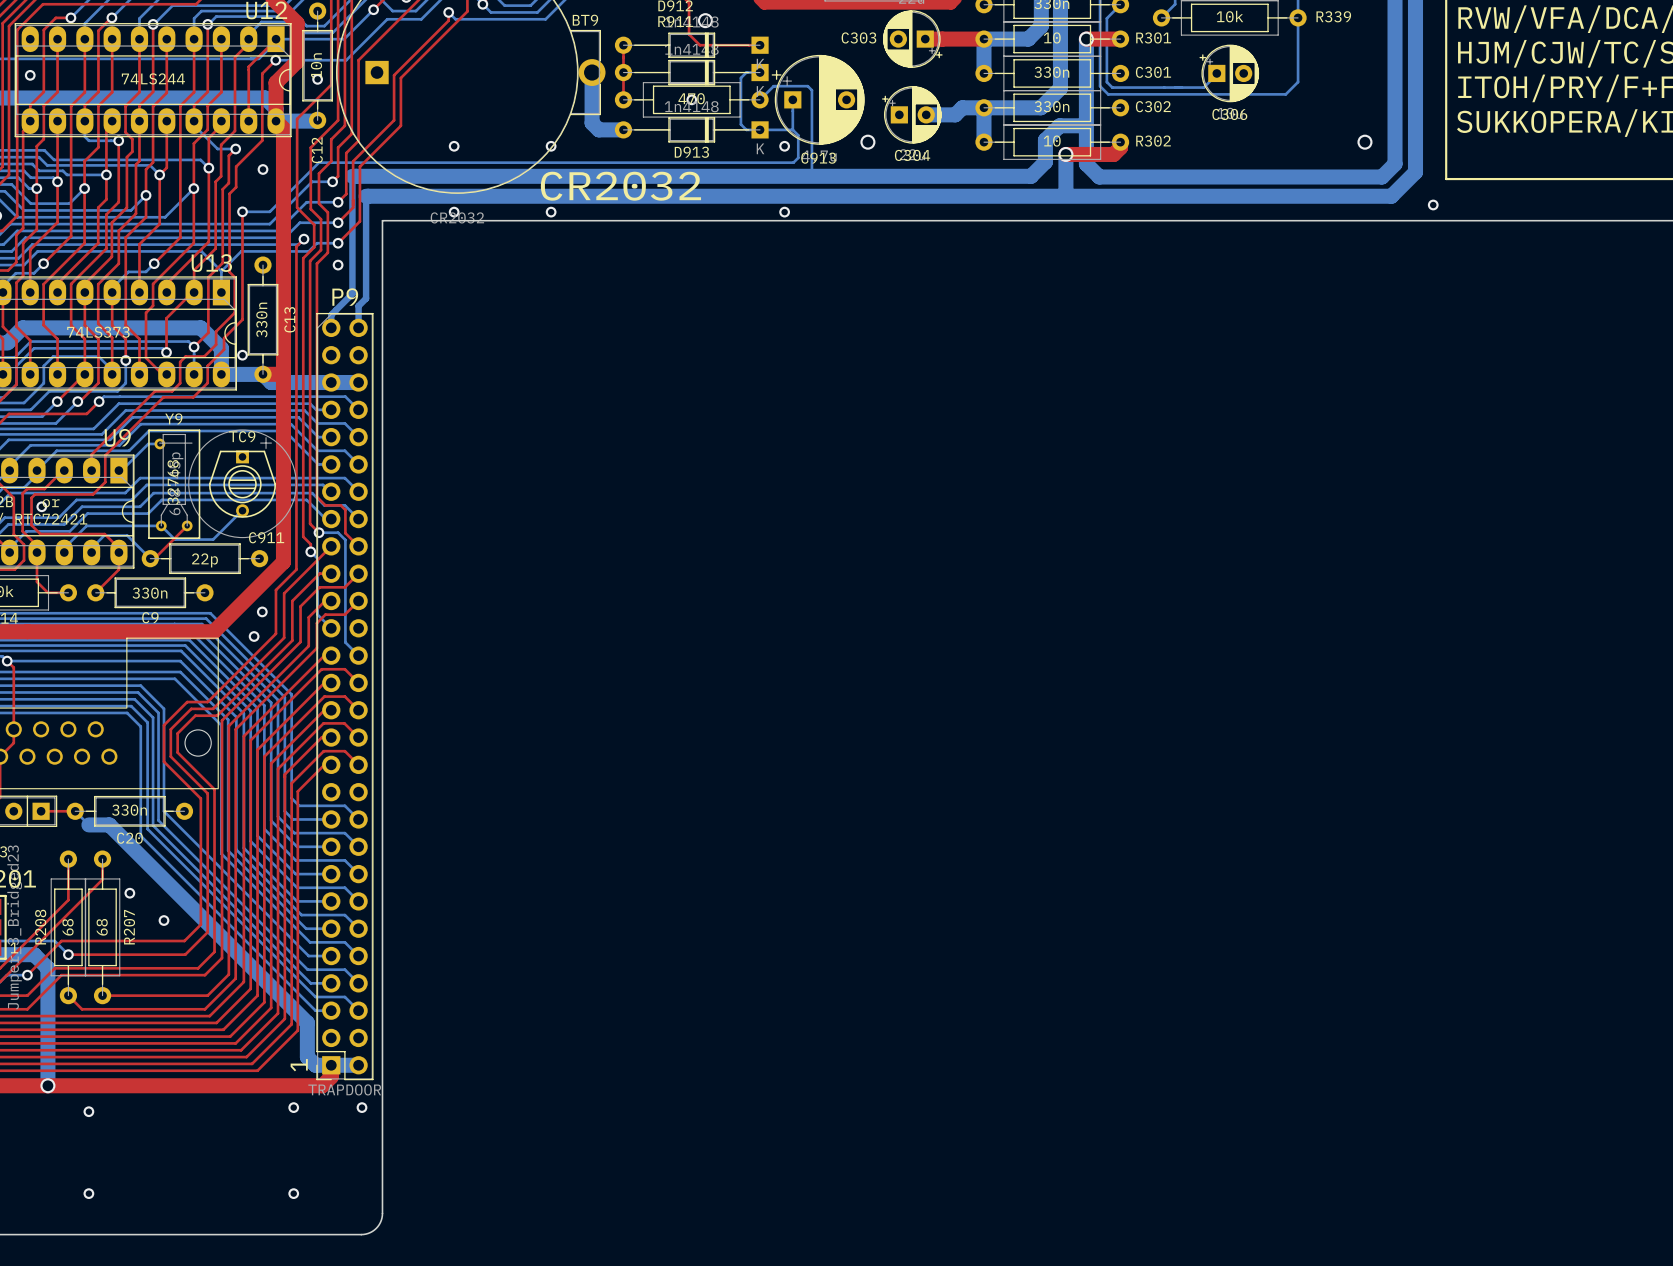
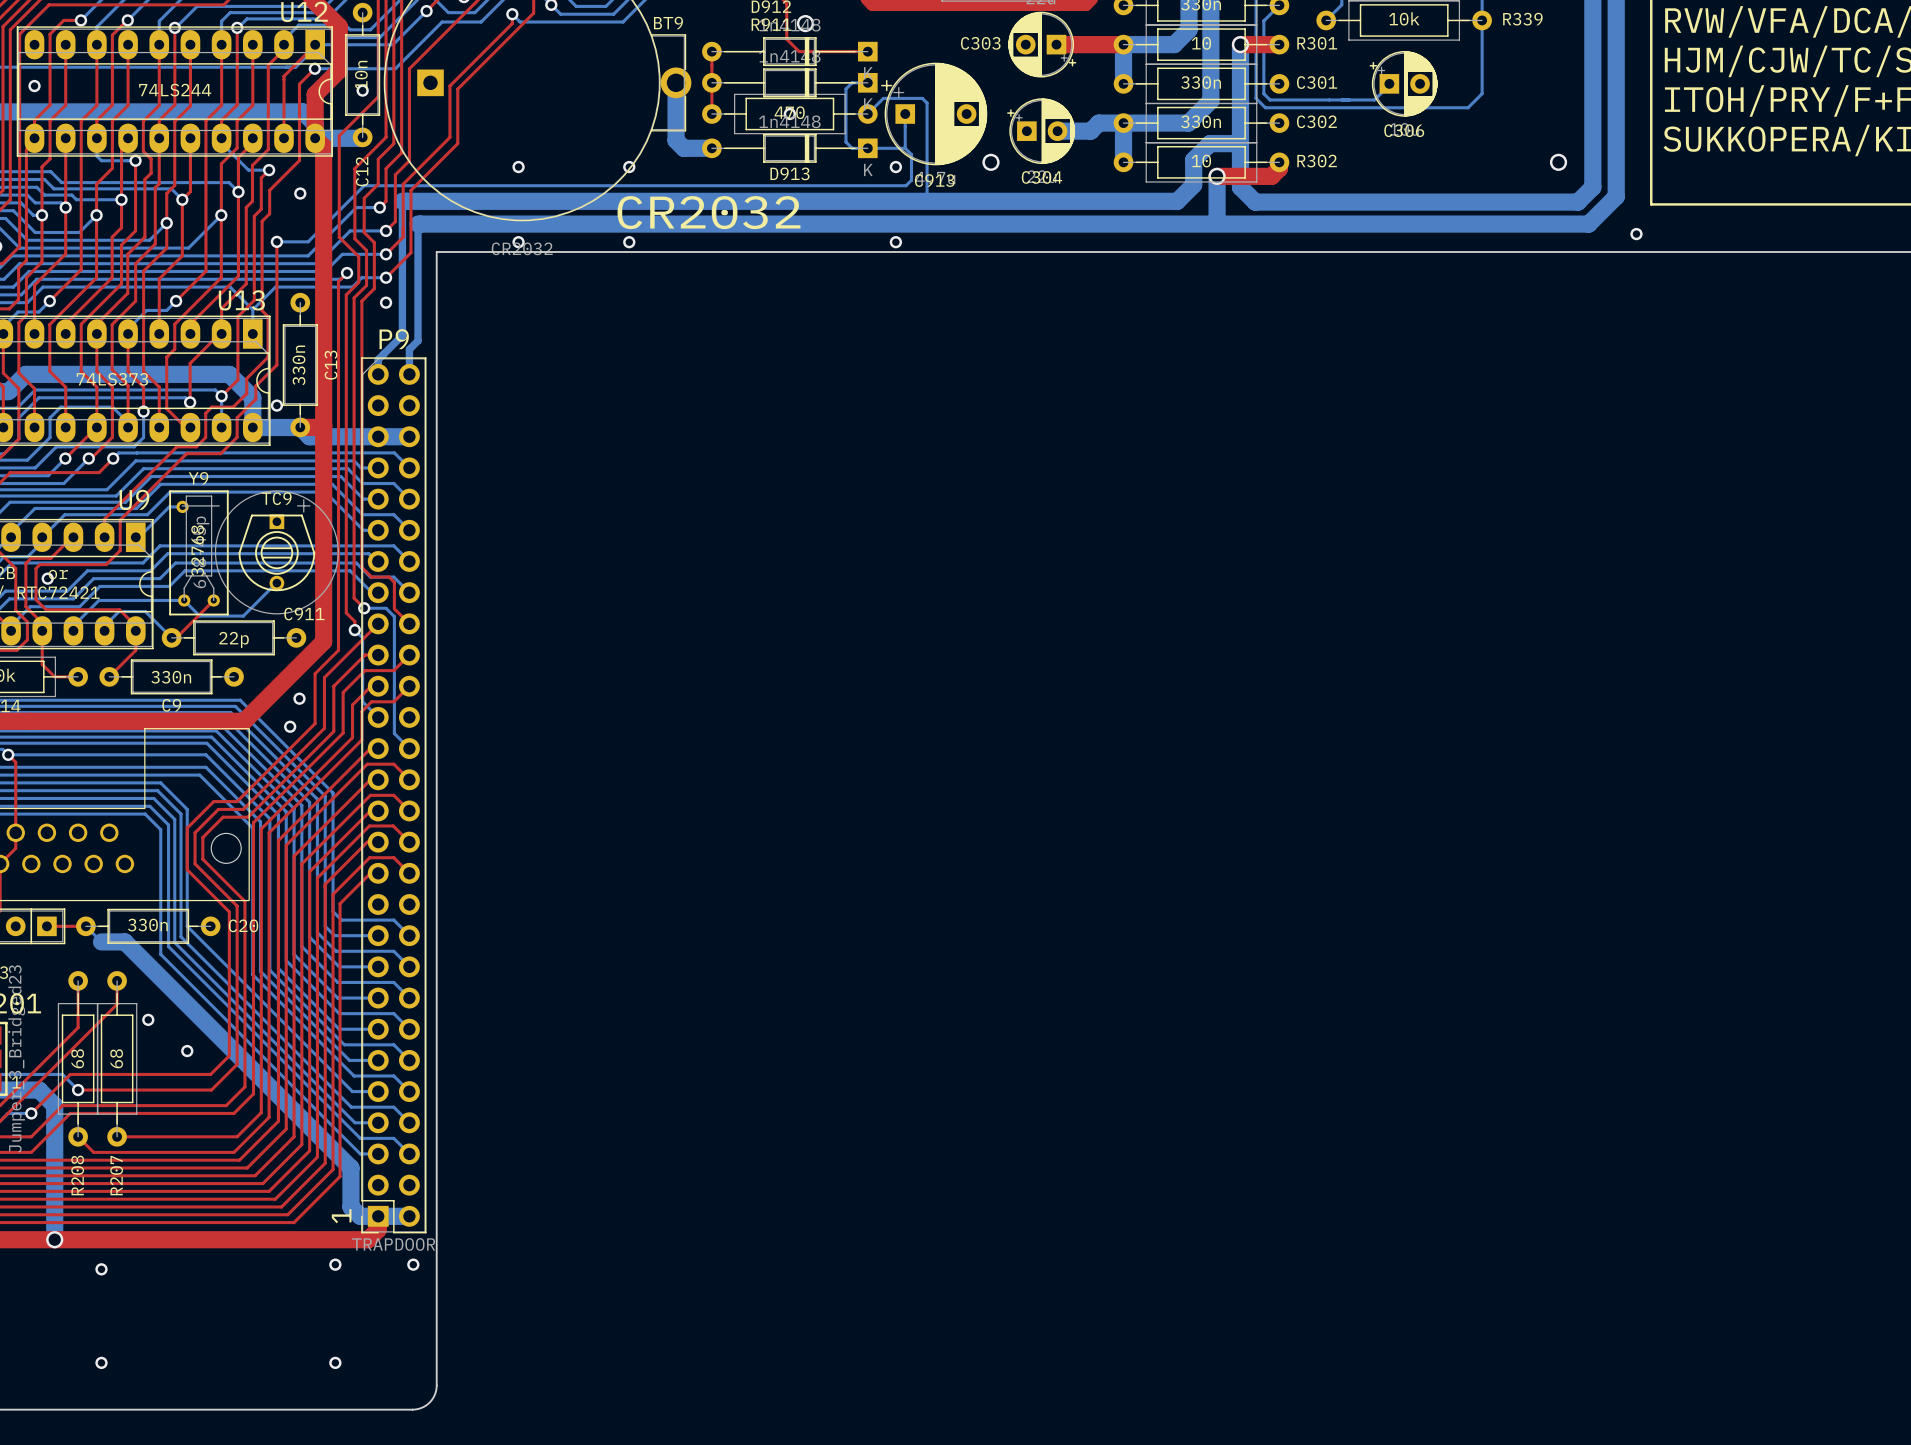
C20 name position: C20 (129, 838) -> C20 (243, 925)
R208 name position: R208 (40, 927) -> R208 (77, 1175)
R207 name position: R207 (129, 927) -> R207 (116, 1175)

